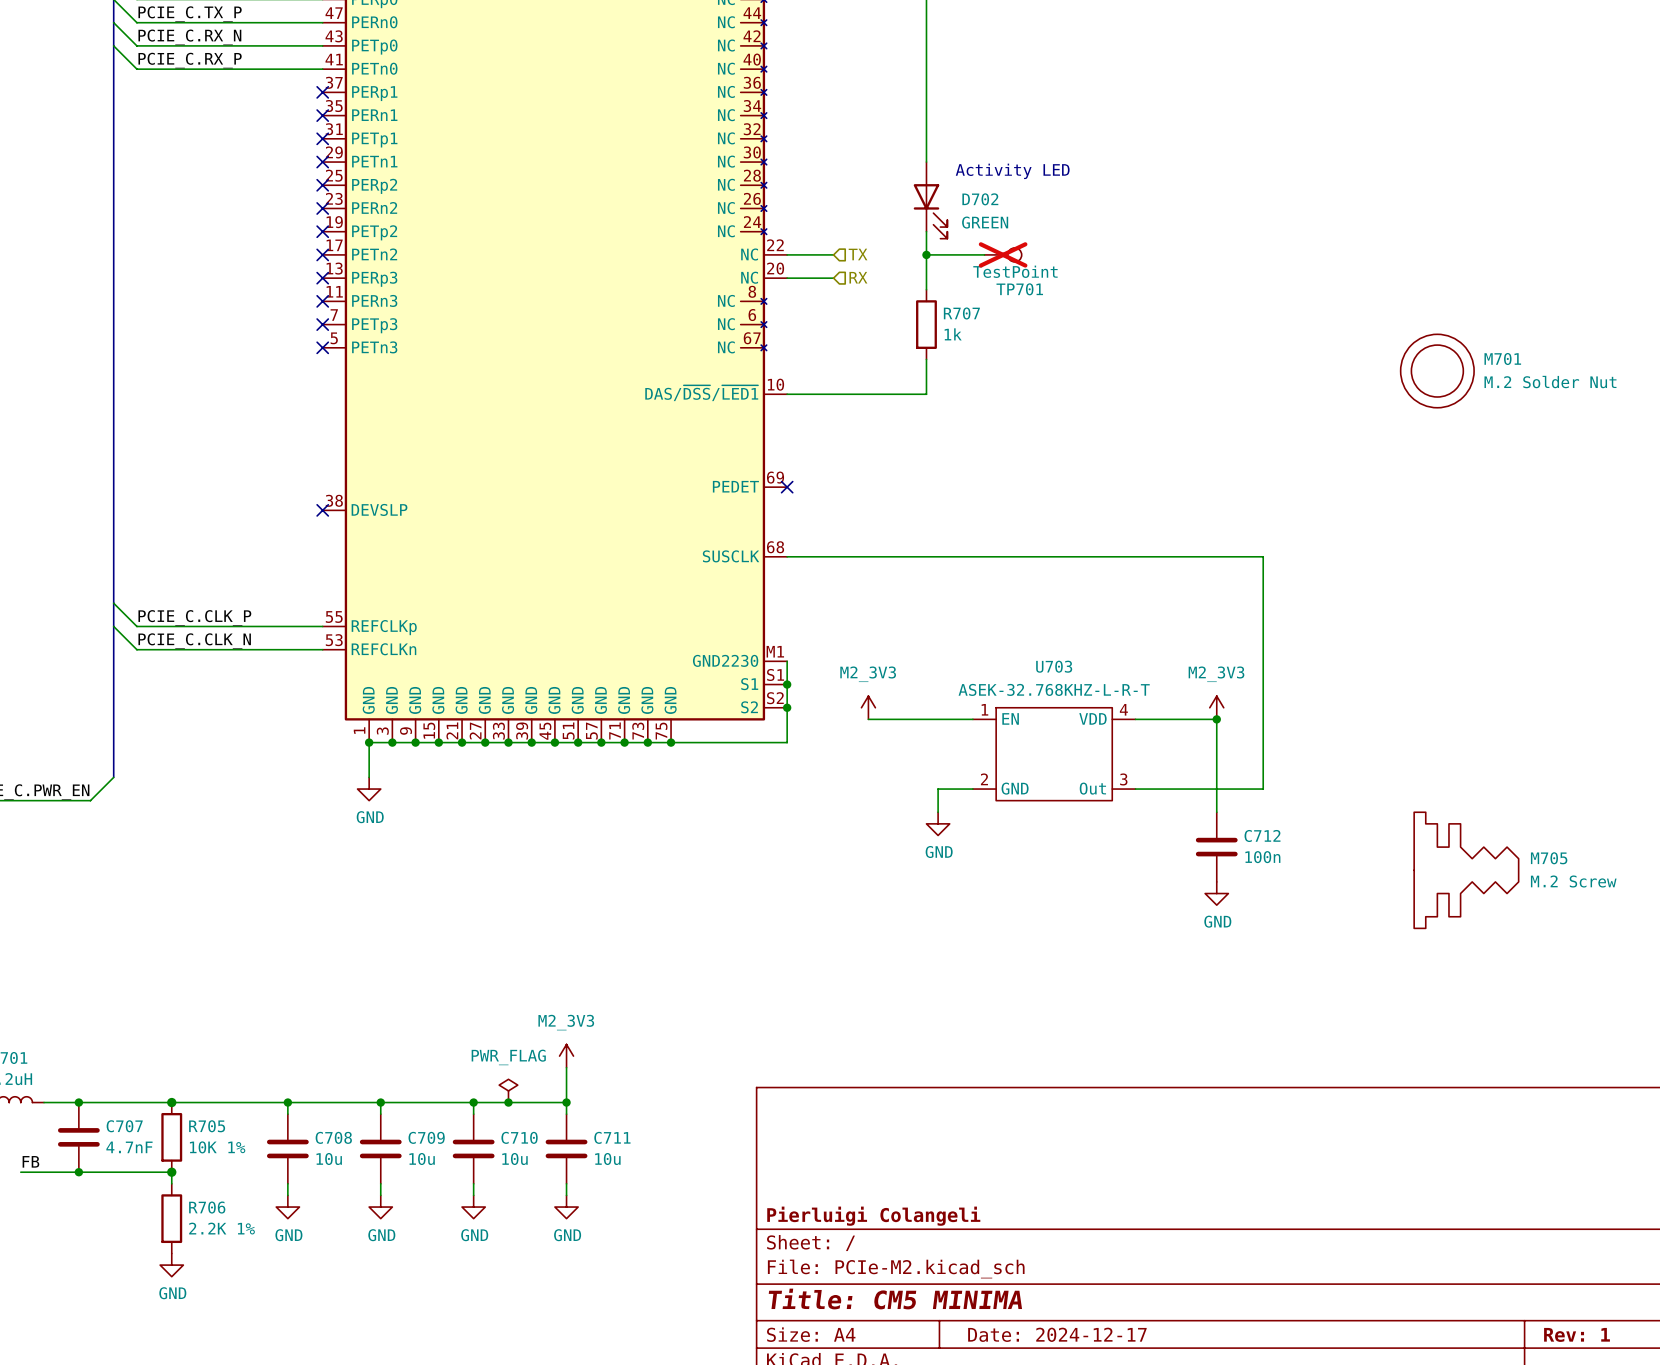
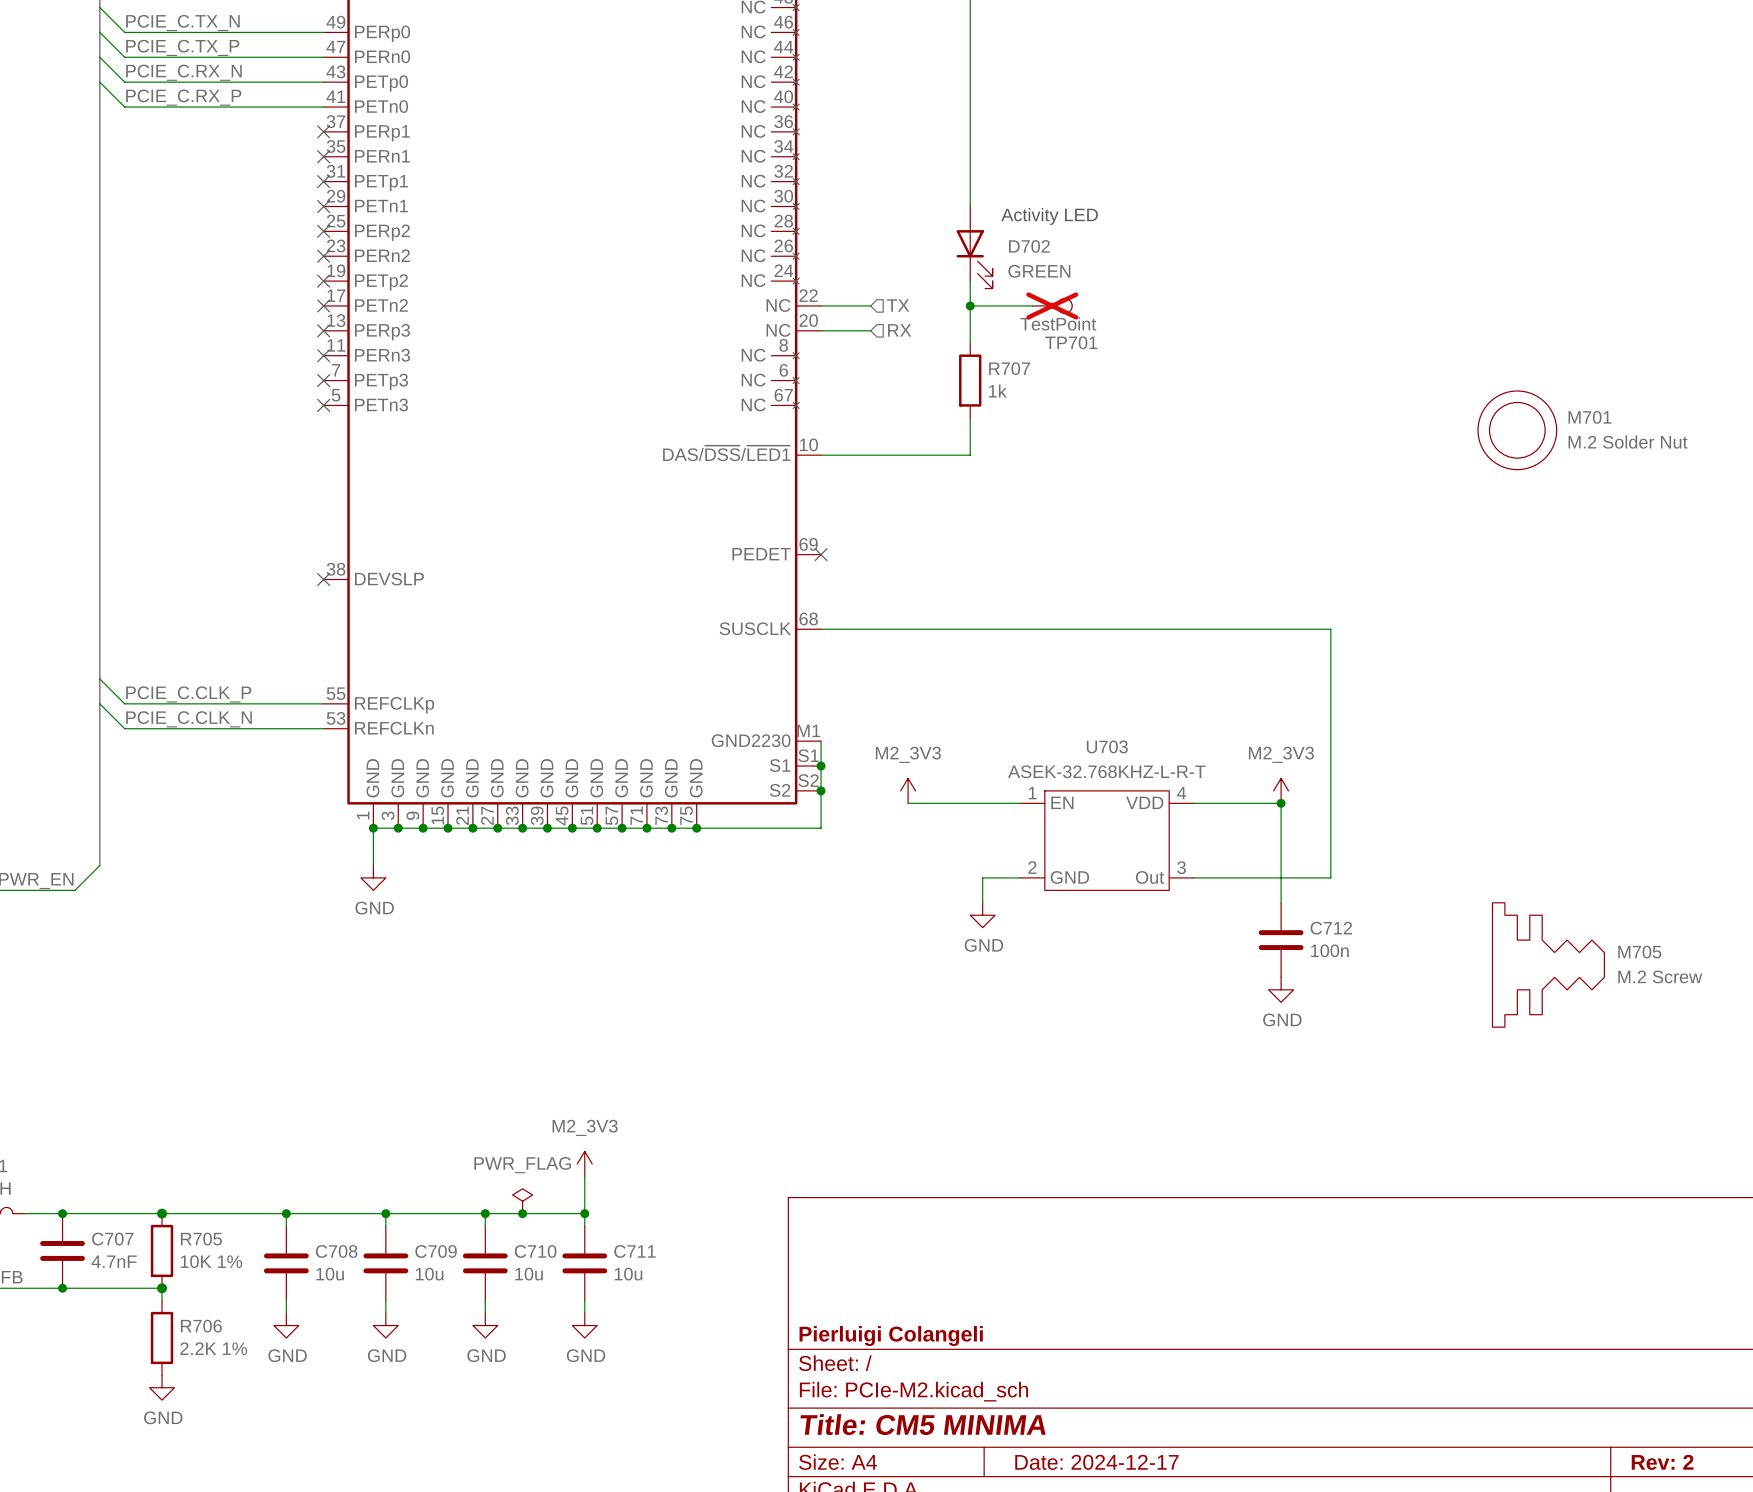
title block: Rev: 1 (1577, 1334) -> Rev: 2 (1662, 1462)

